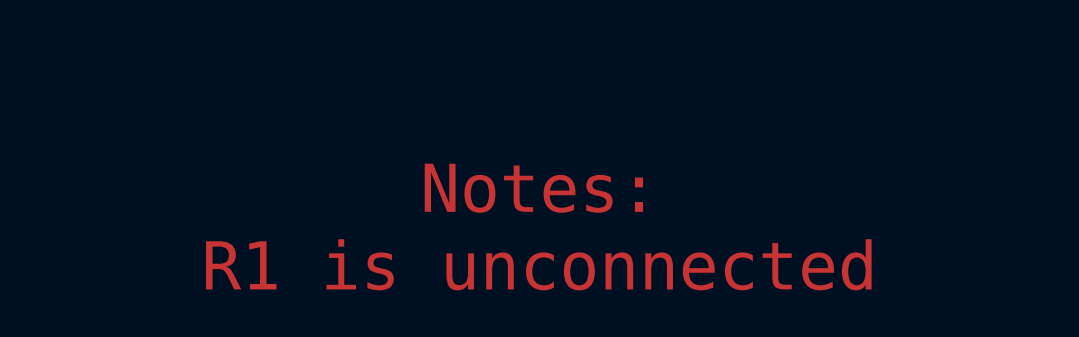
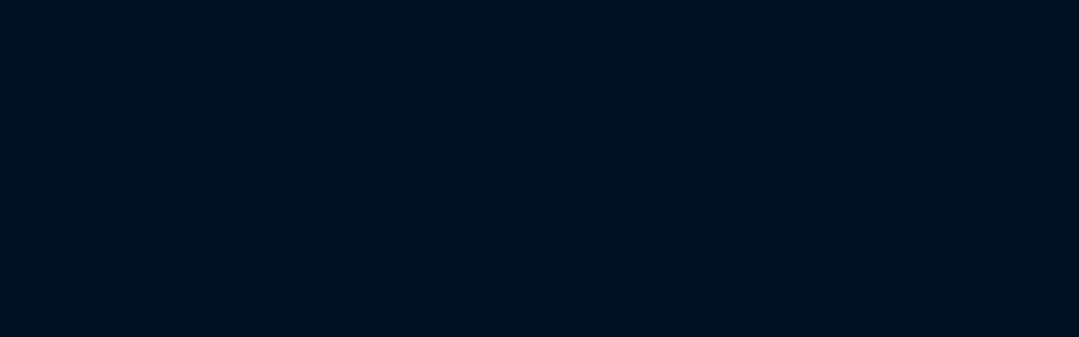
text: Notes: (533, 188) -> none
text: R1 is unconnected (538, 264) -> none

